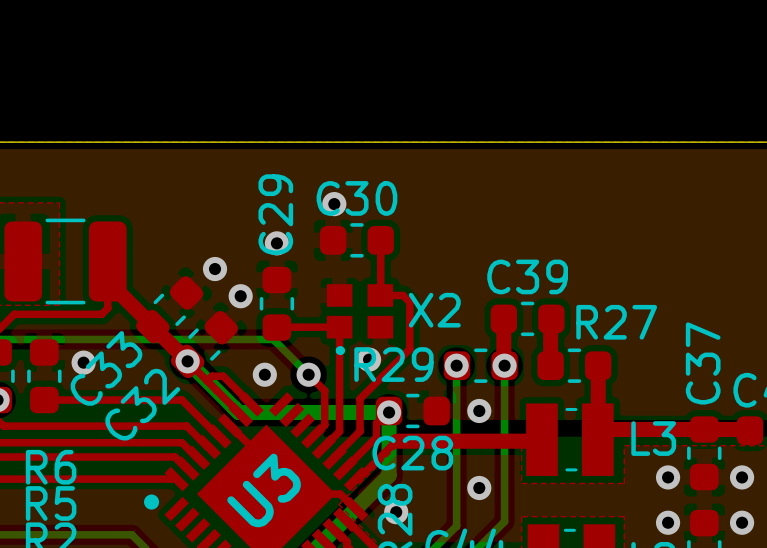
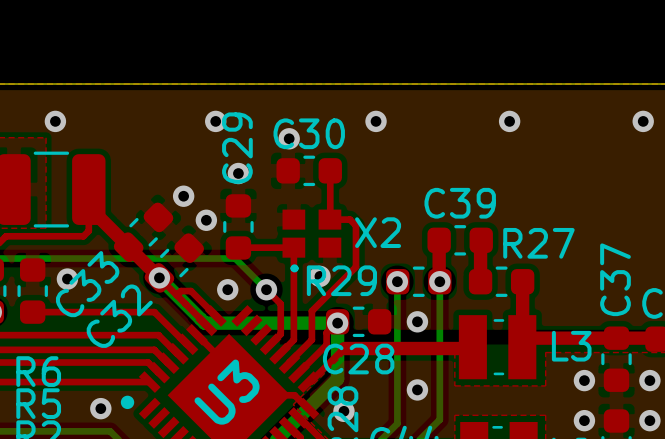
via: none -> (55, 121)
via: none -> (215, 121)
via: none -> (376, 121)
via: none -> (509, 121)
via: none -> (643, 121)
via: none -> (100, 408)

